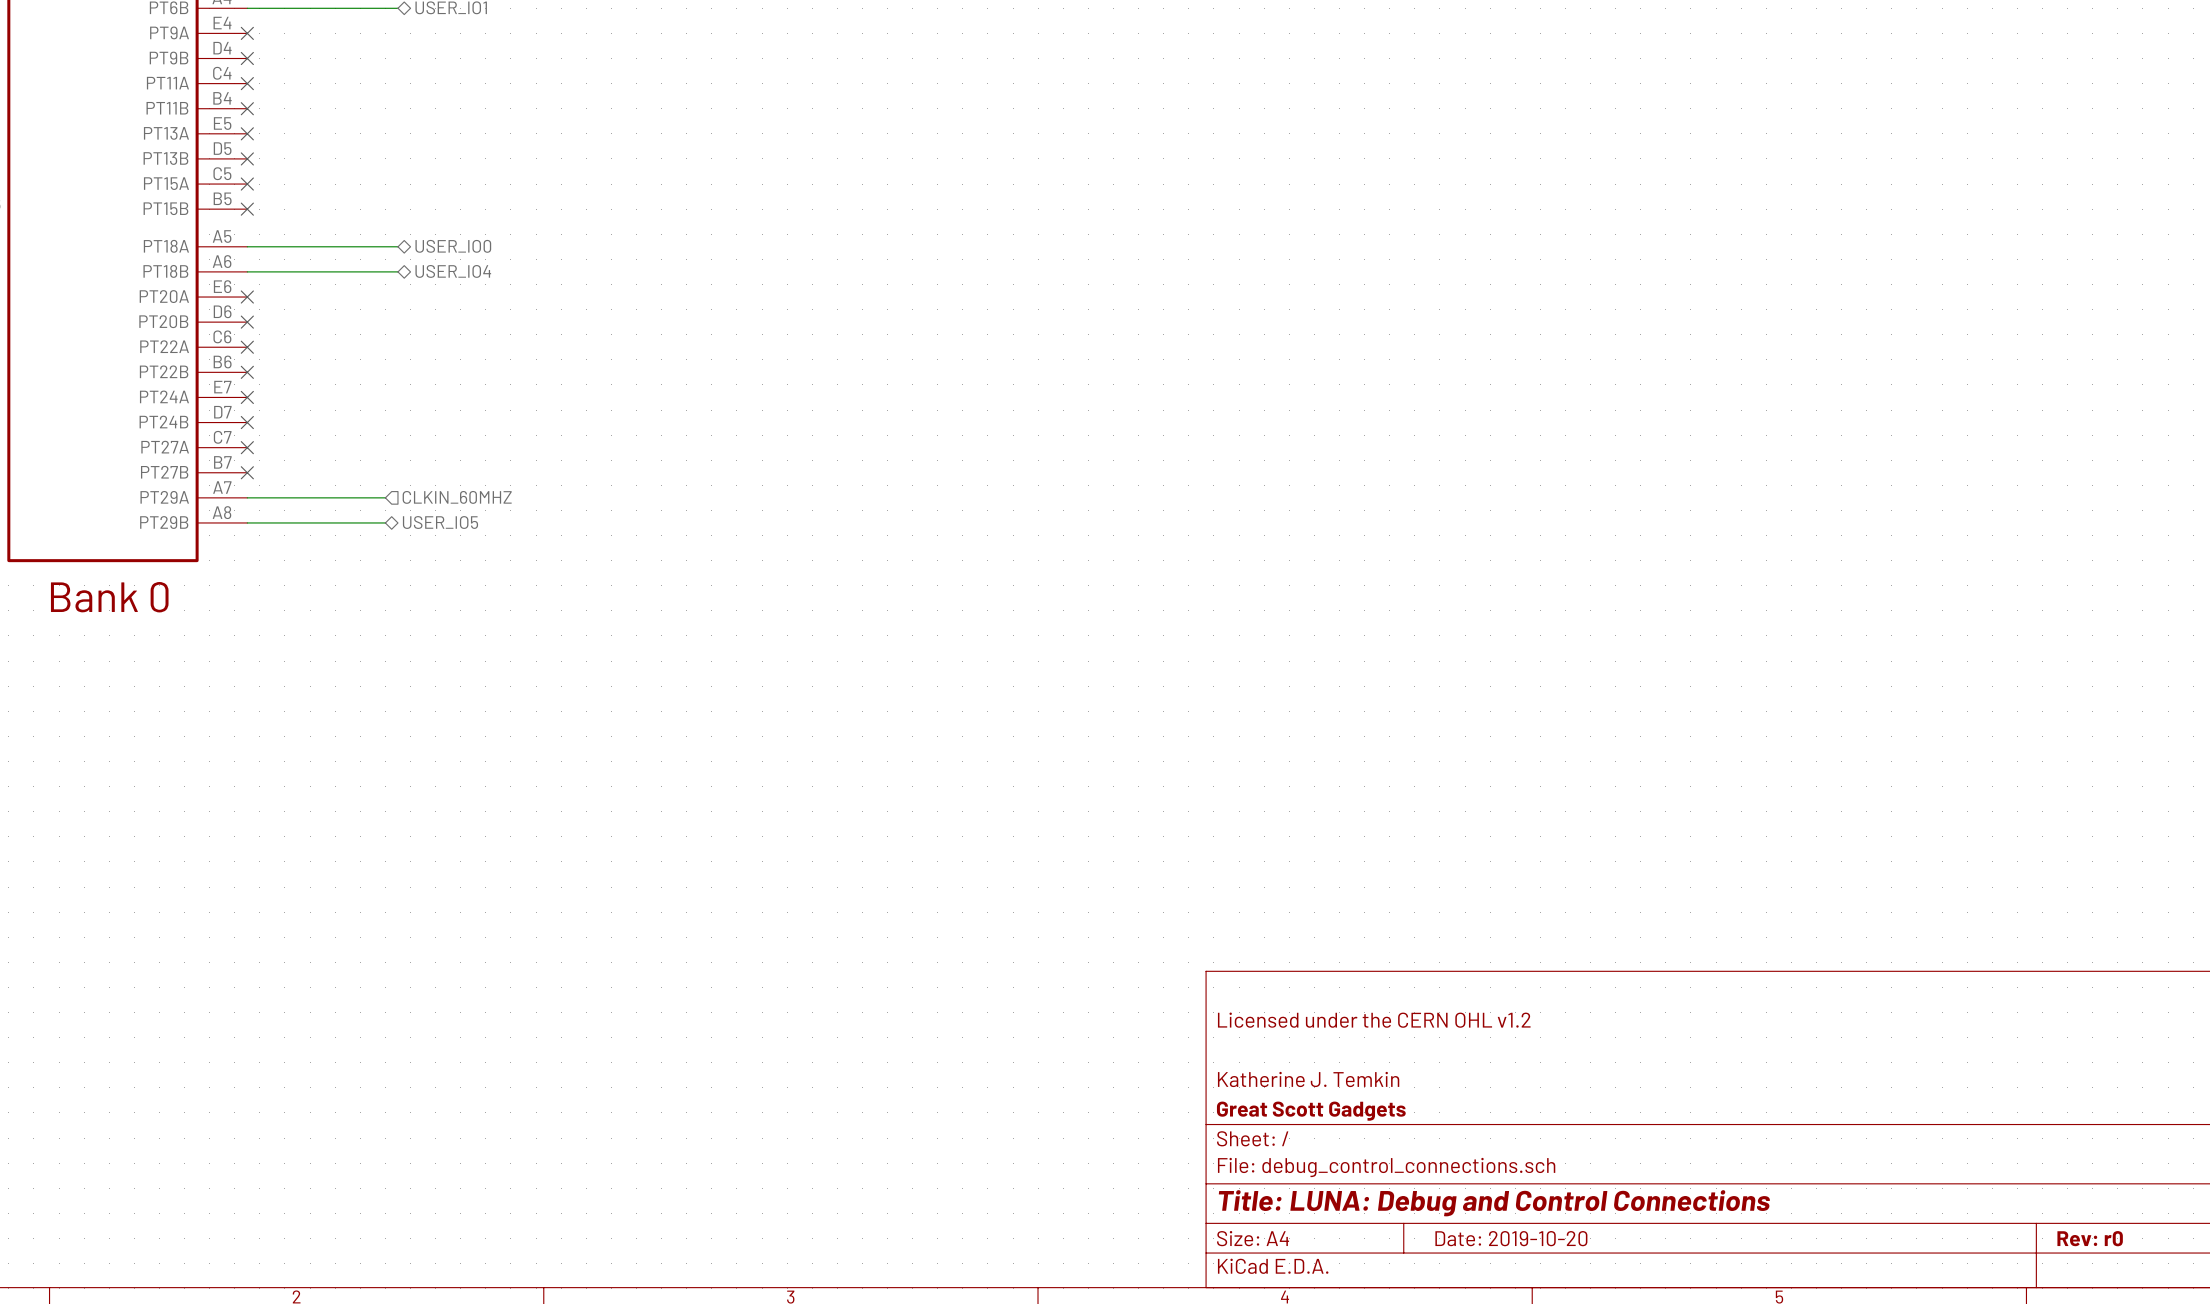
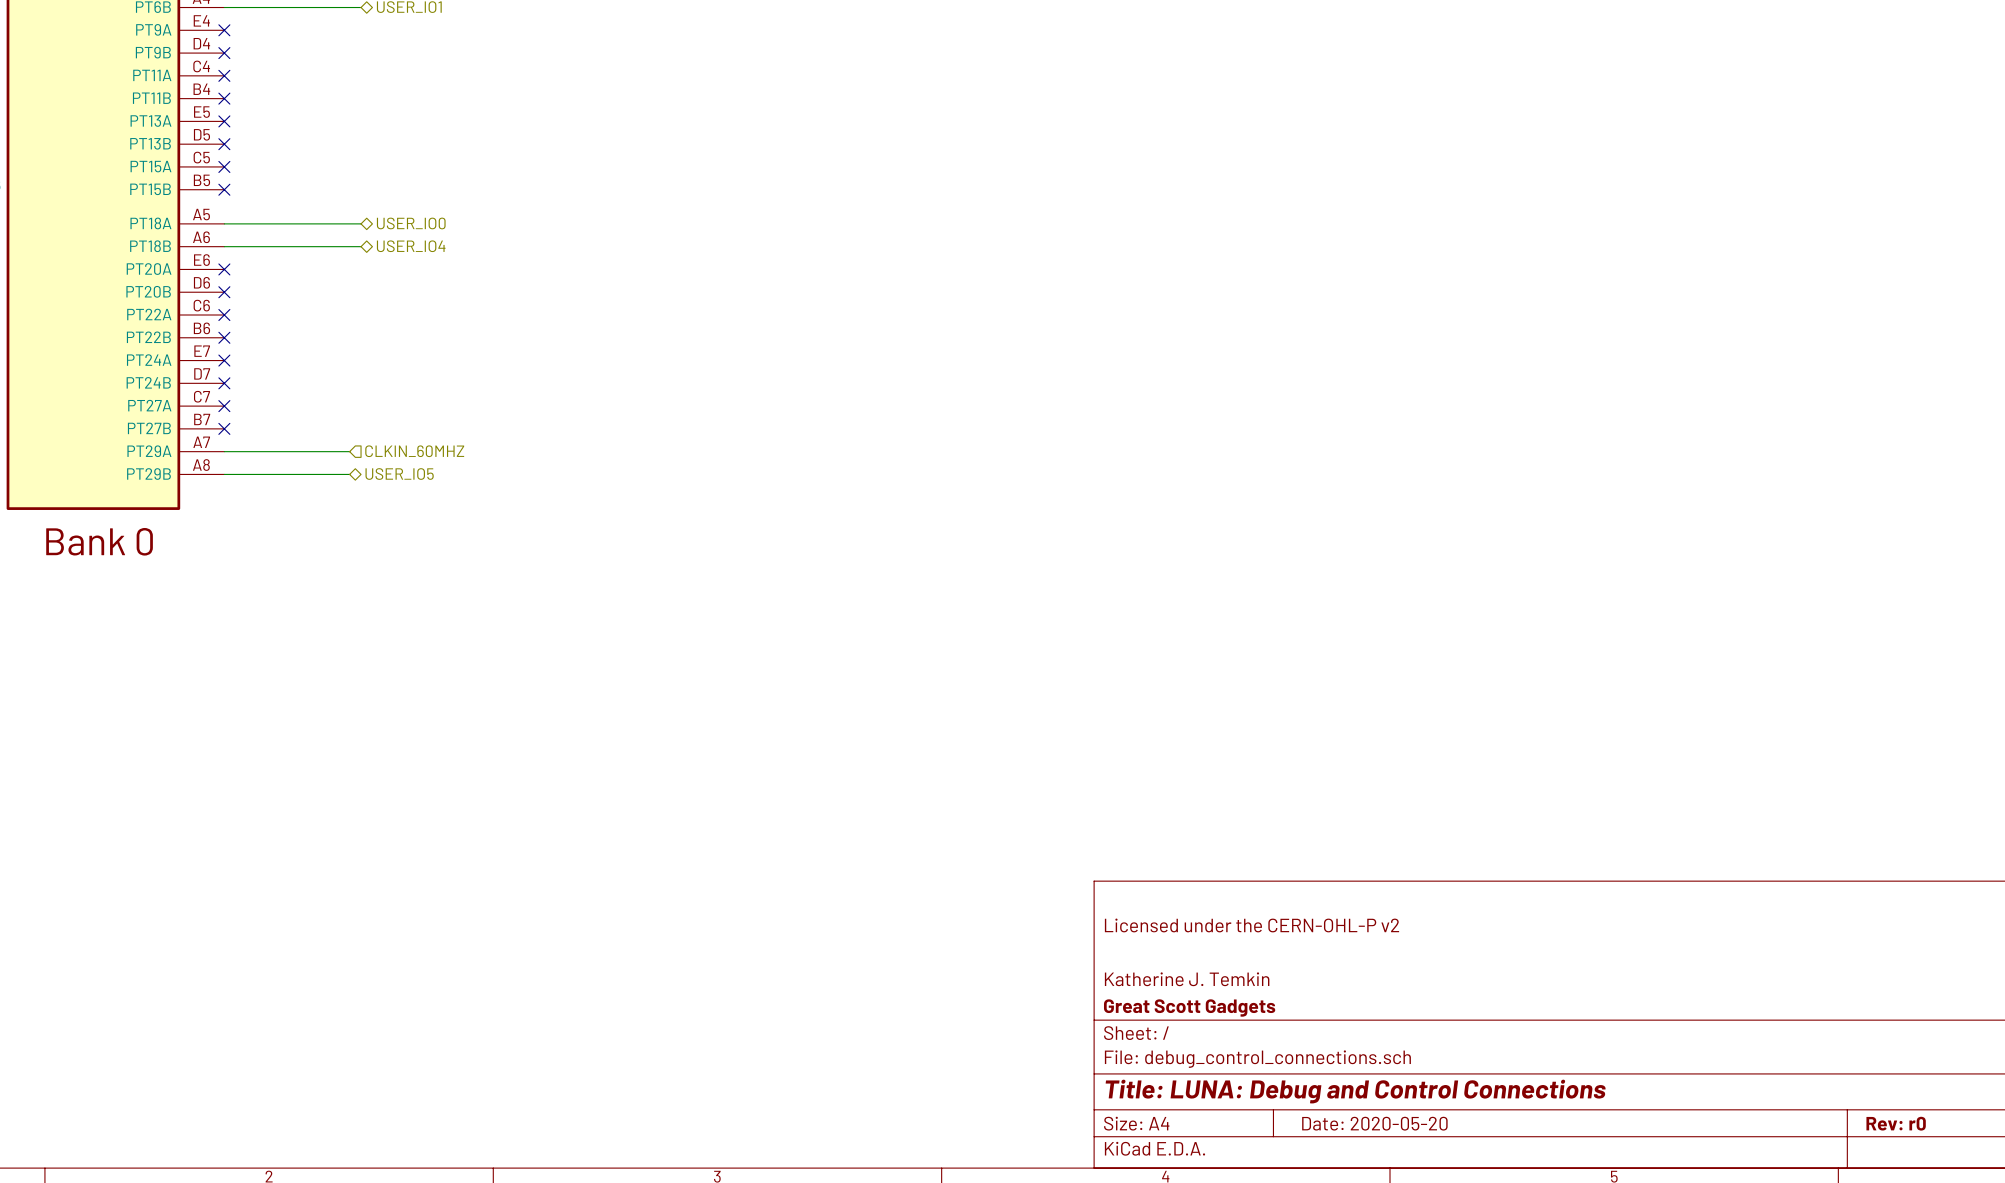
title block: Licensed under the CERN OHL v1.2 (1374, 1020) -> Licensed under the CERN-OHL-P v2 (1251, 925)
title block: Date: 2019-10-20 (1511, 1238) -> Date: 2020-05-20 (1374, 1123)

